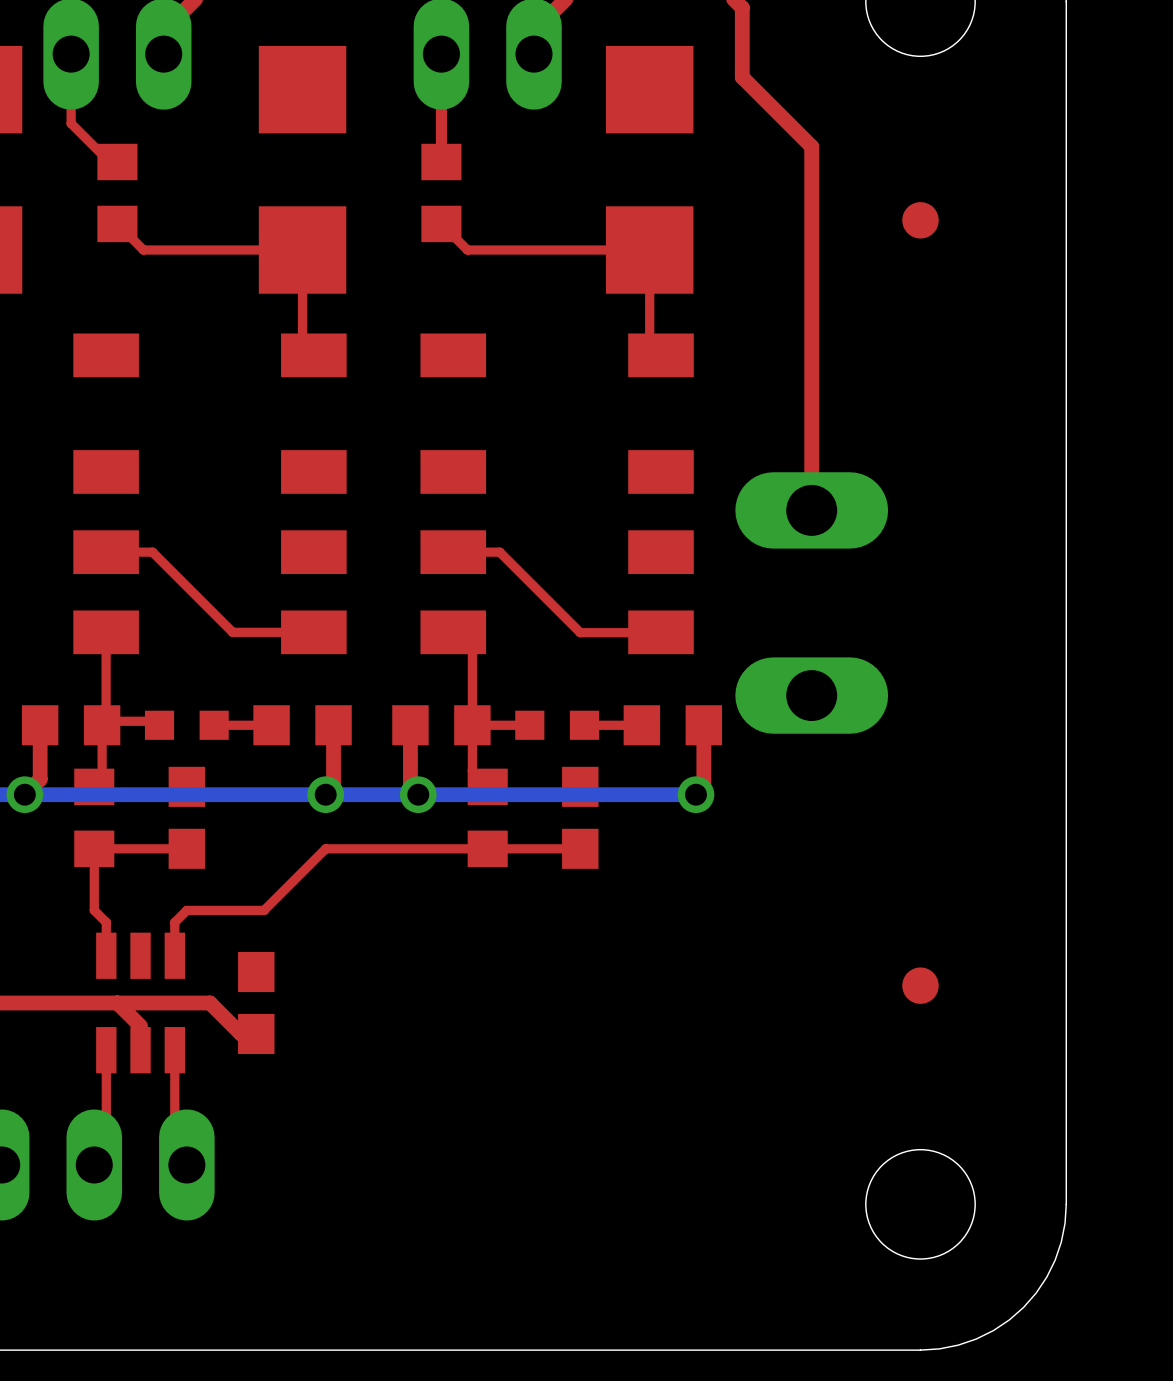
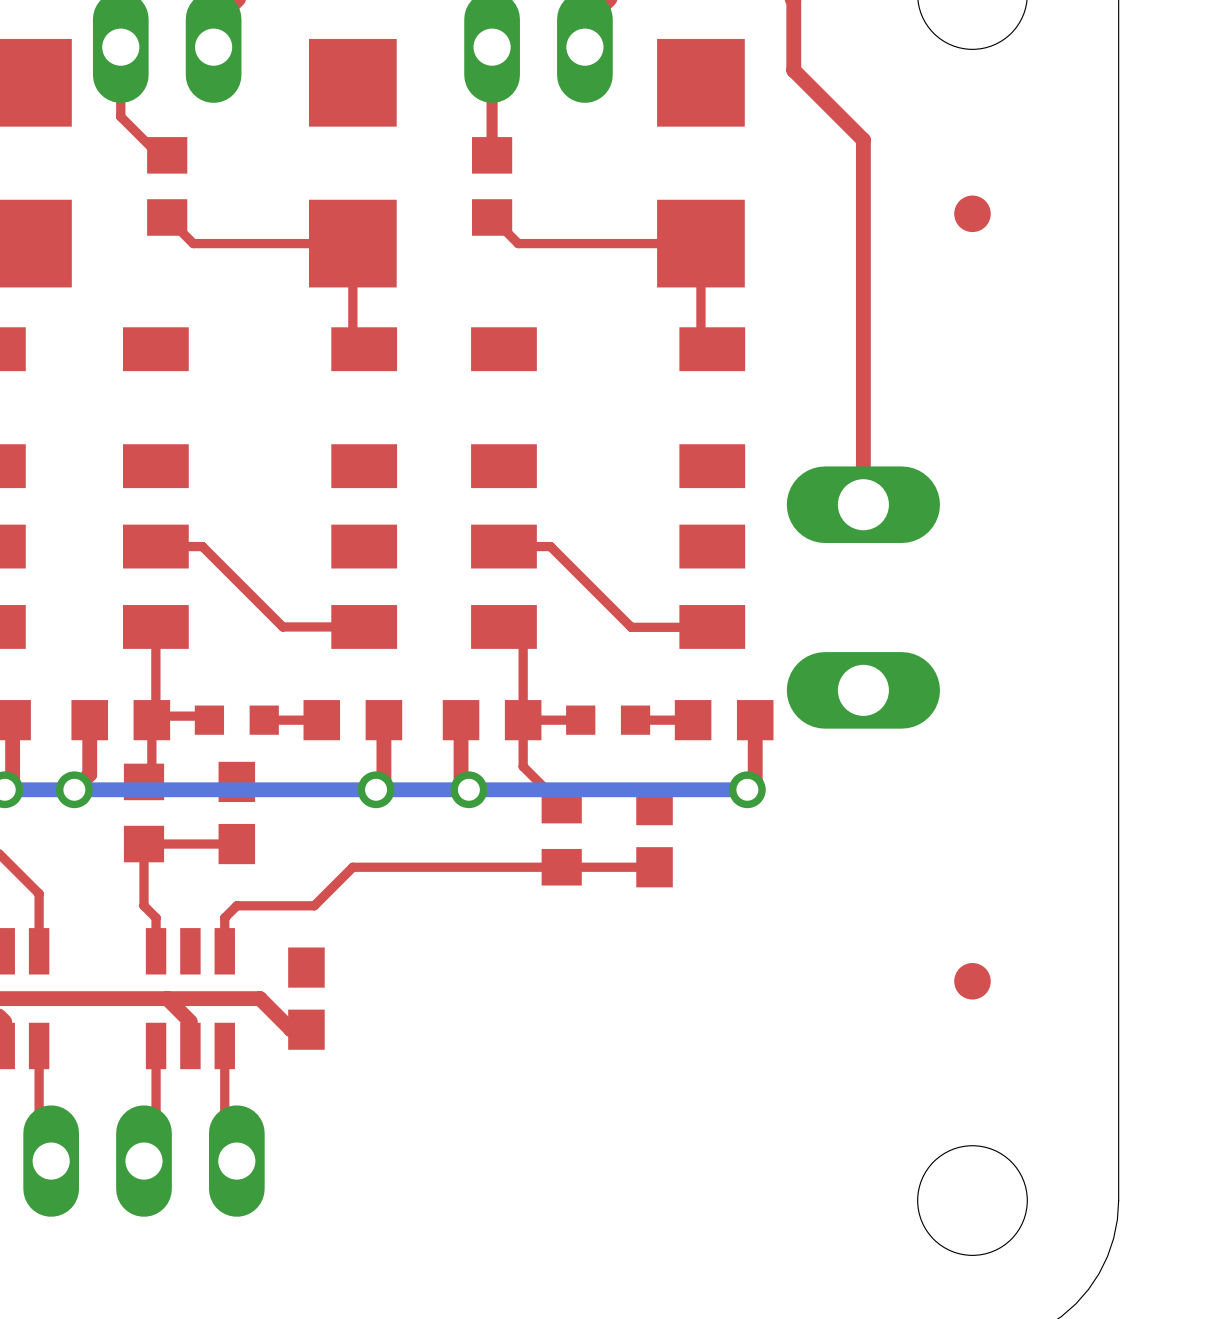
part position: (487, 817) -> (561, 836)
part position: (580, 817) -> (654, 836)
top track: (580, 848) (325, 848) (302, 871) -> (654, 867) (352, 867)

